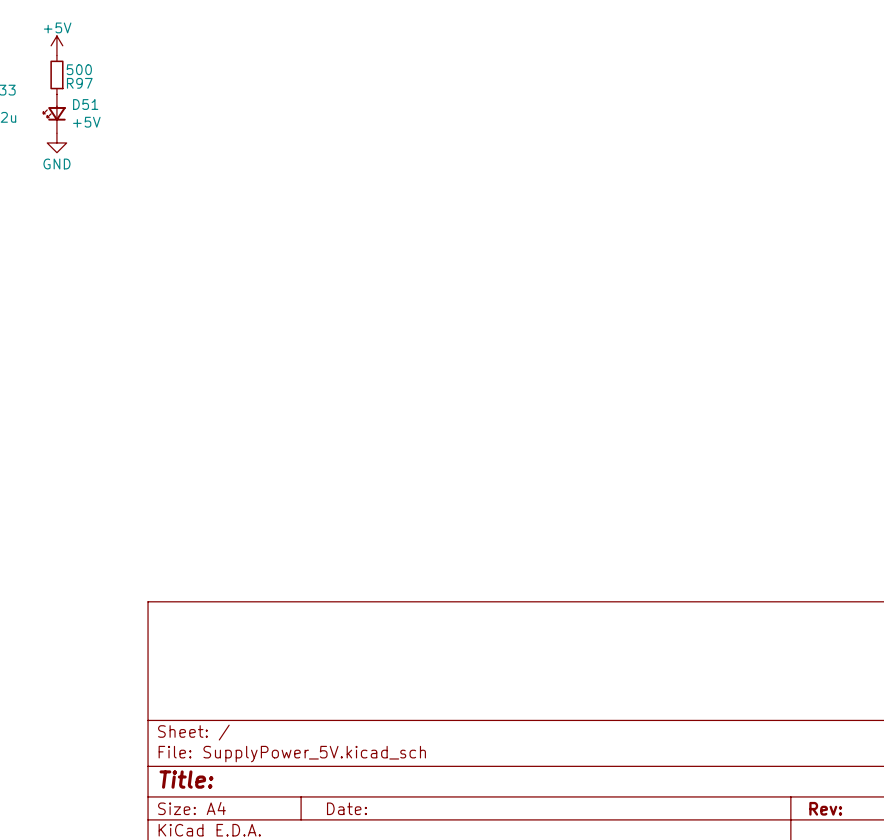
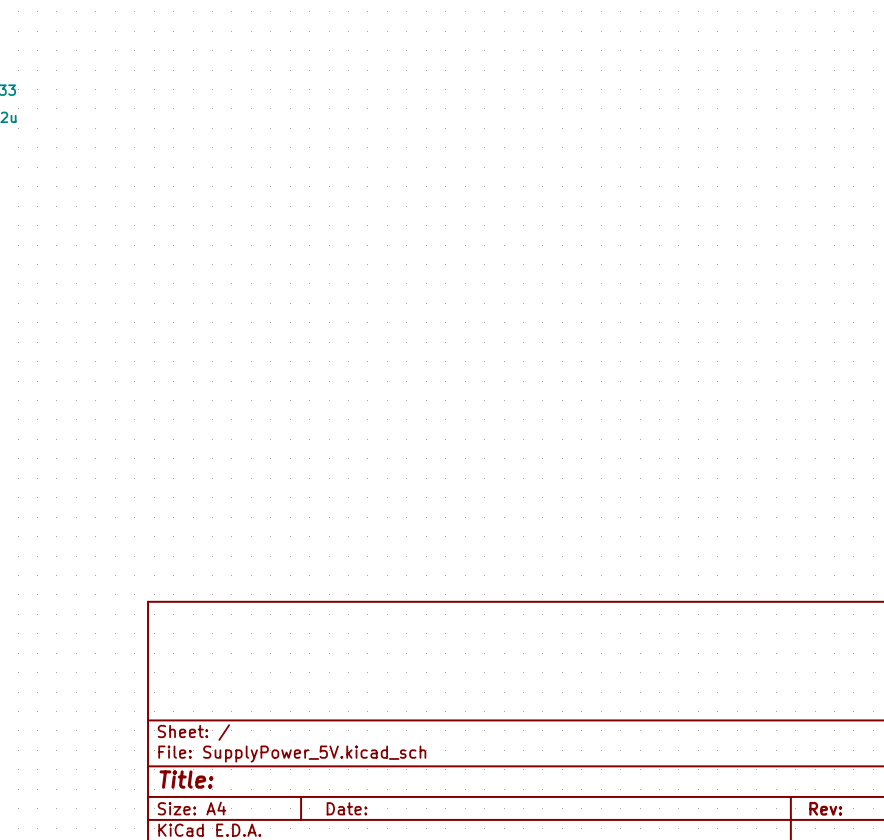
power symbol: +5V (56, 45) -> none
R97: 500 (56, 74) -> none
D51: +5V (54, 113) -> none
power symbol: GND (56, 142) -> none

